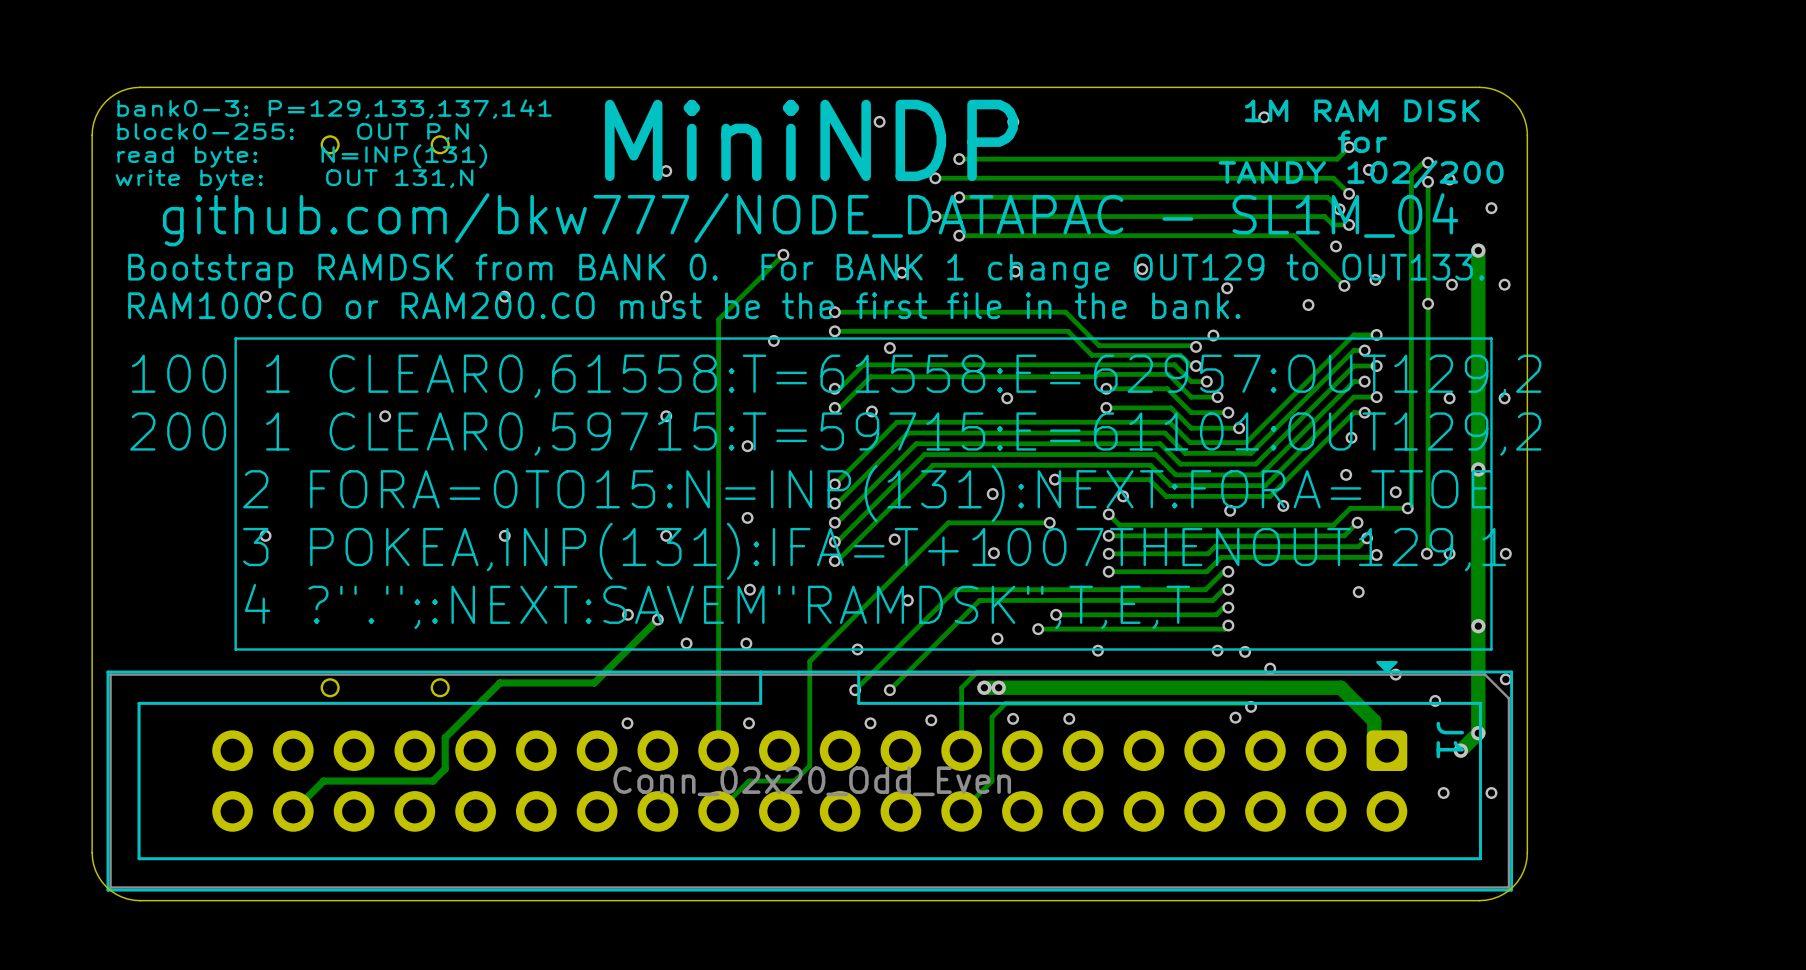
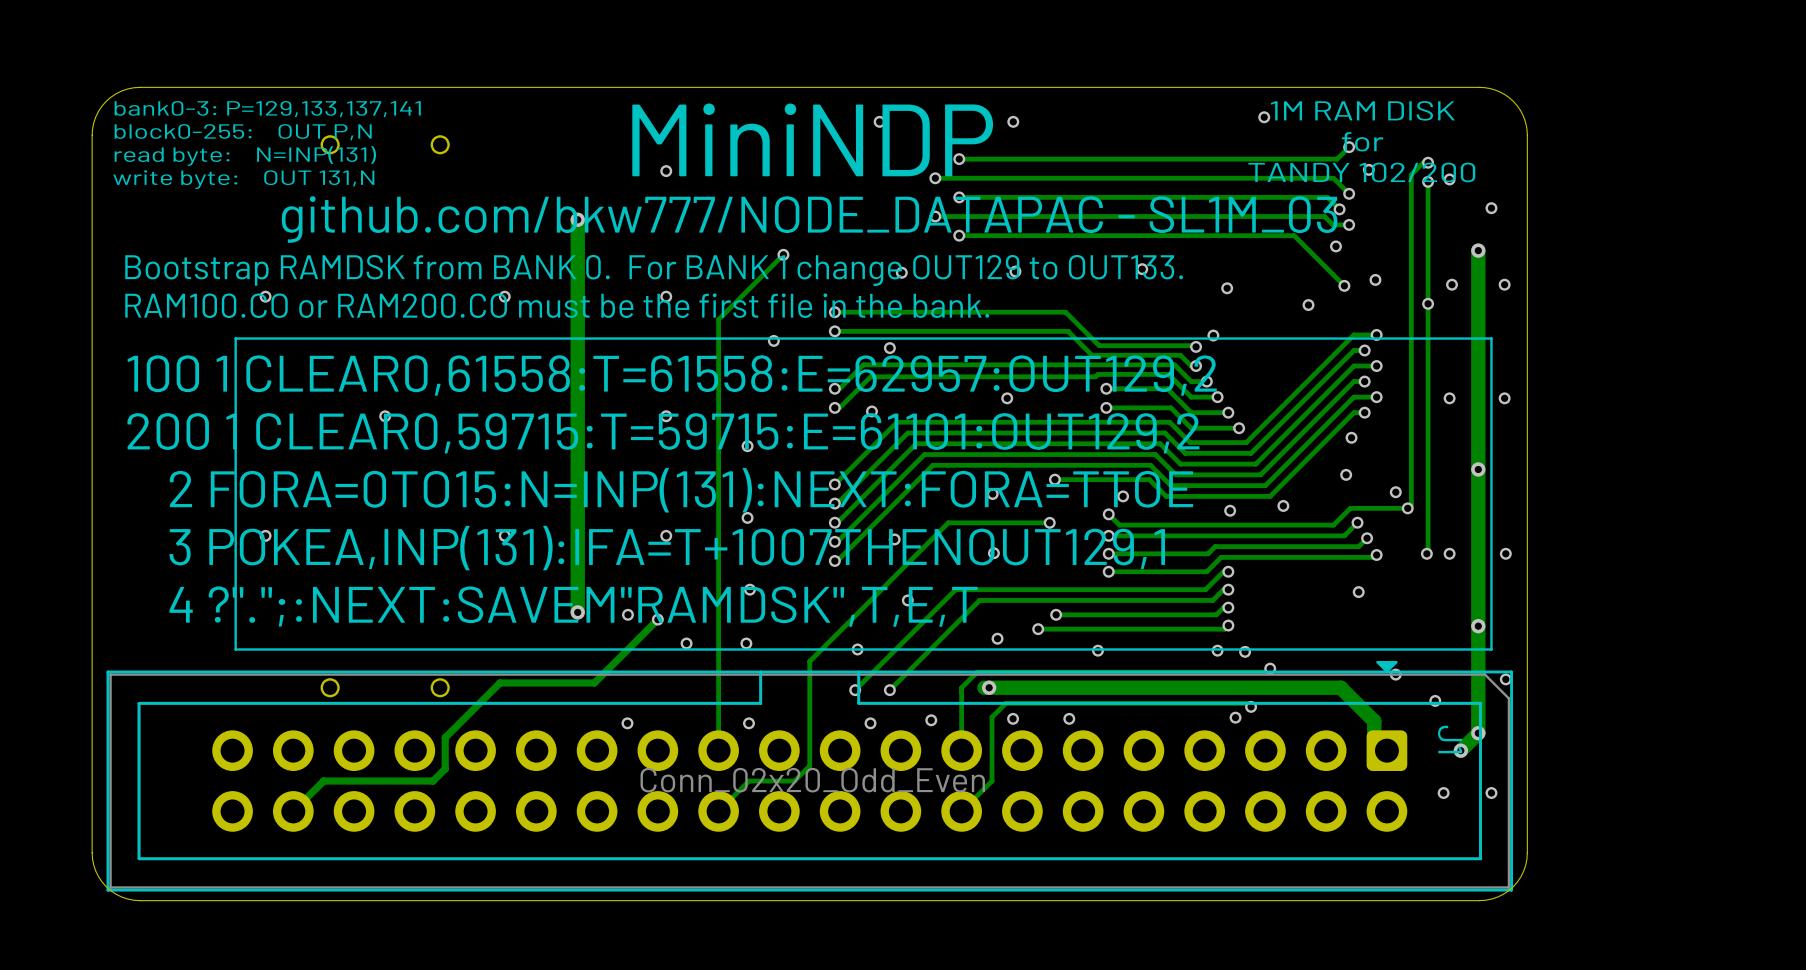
track: none -> (577, 219) (577, 612)
via: none -> (577, 219)
text: github.com/bkw777/NODE_DATAPAC - SL1M_04 (810, 219) -> github.com/bkw777/NODE_DATAPAC - SL1M_03 (809, 219)
via: none -> (577, 612)
via: (984, 687) -> none
via: none -> (989, 687)
via: (998, 687) -> none

